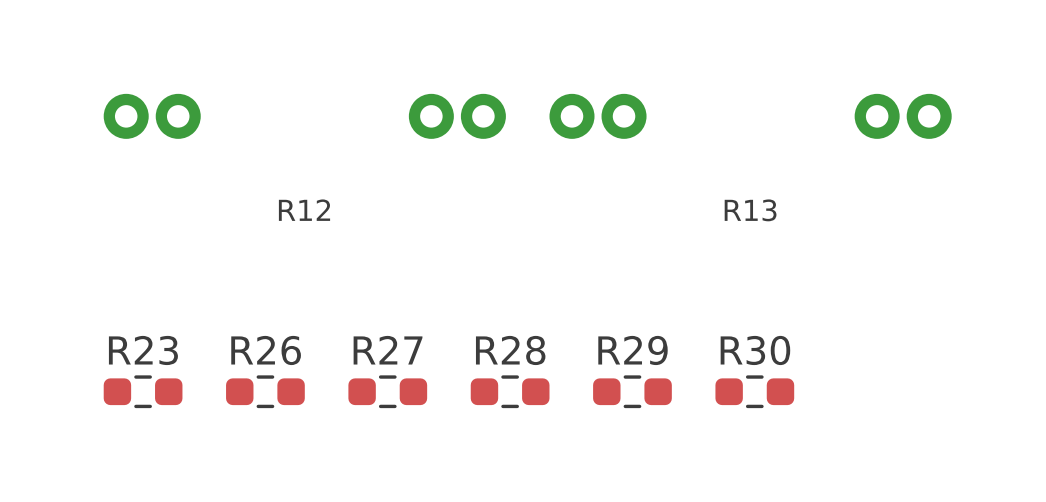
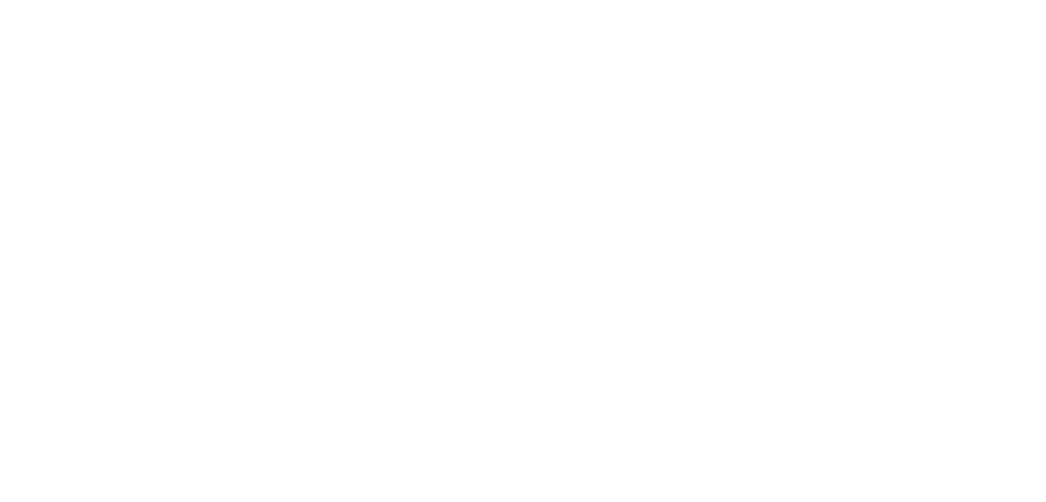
R12: (304, 116) -> none
R13: (750, 116) -> none
R23: (143, 391) -> none
R26: (265, 391) -> none
R27: (387, 391) -> none
R28: (510, 391) -> none
R29: (632, 391) -> none
R30: (754, 391) -> none

